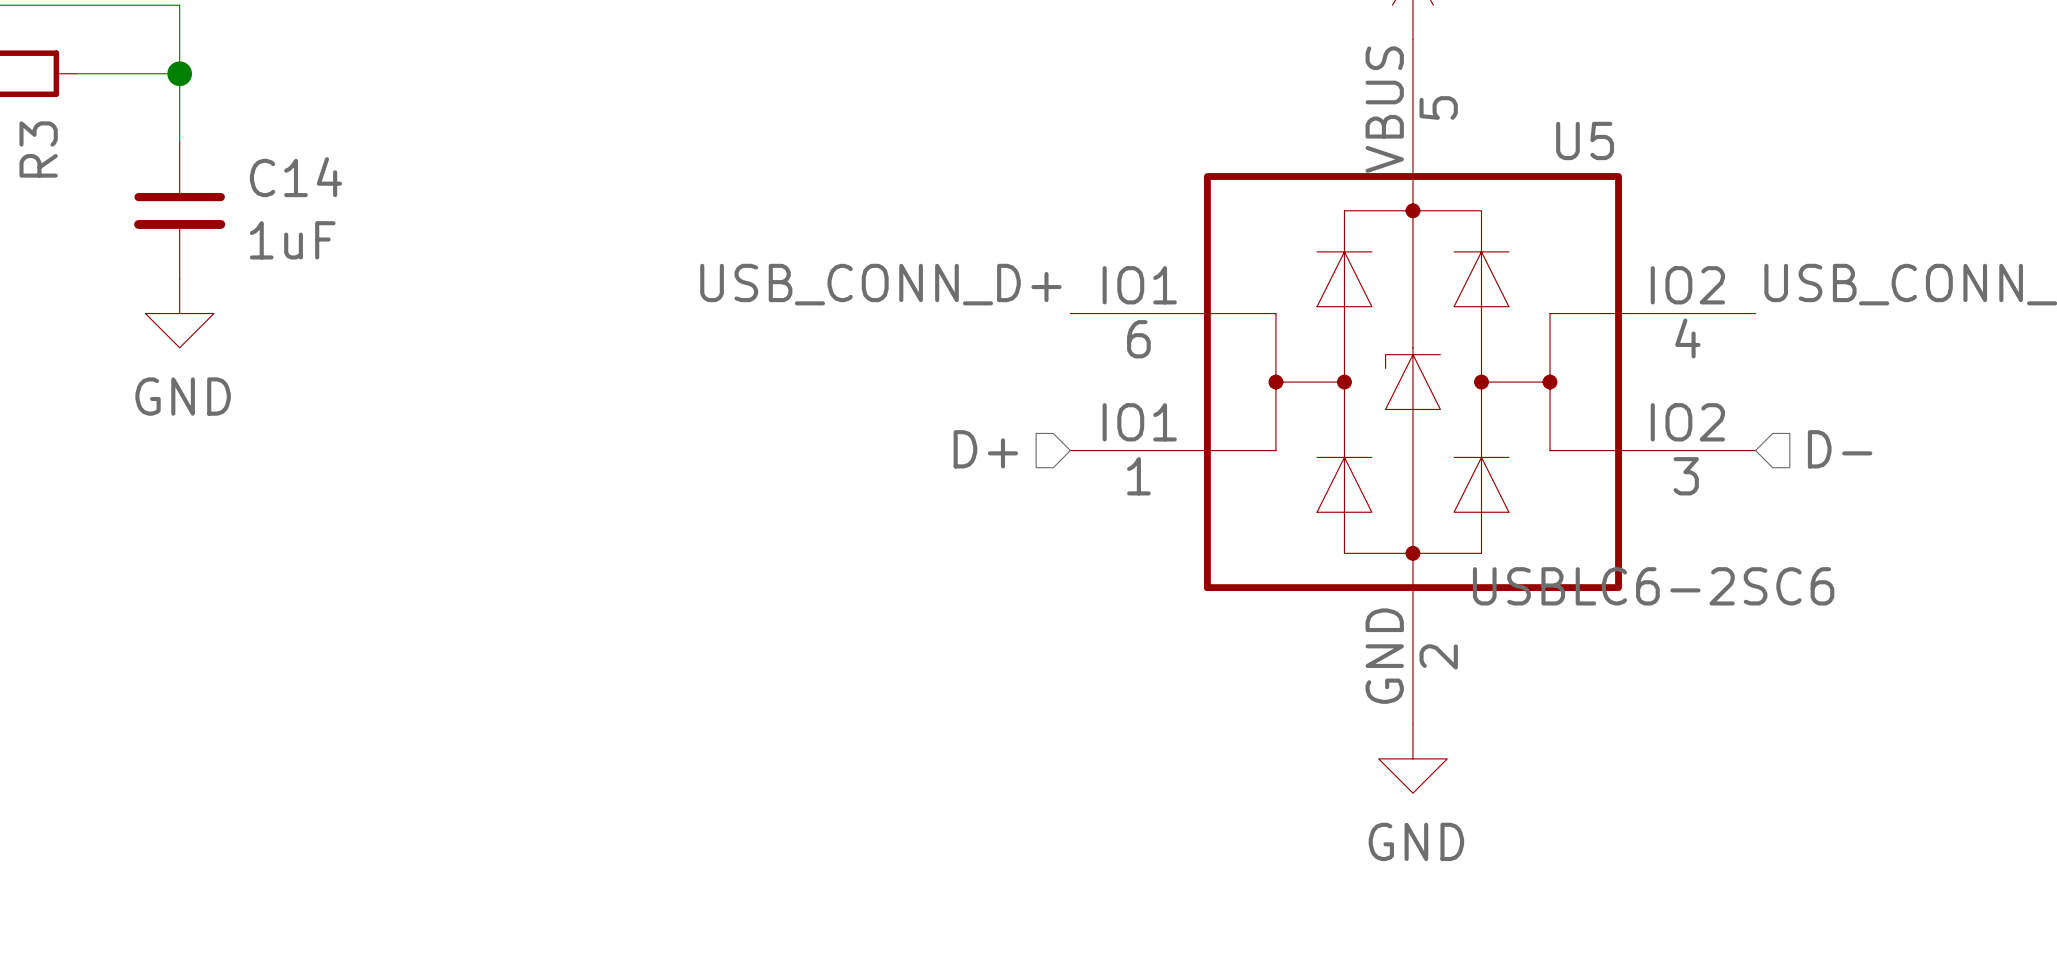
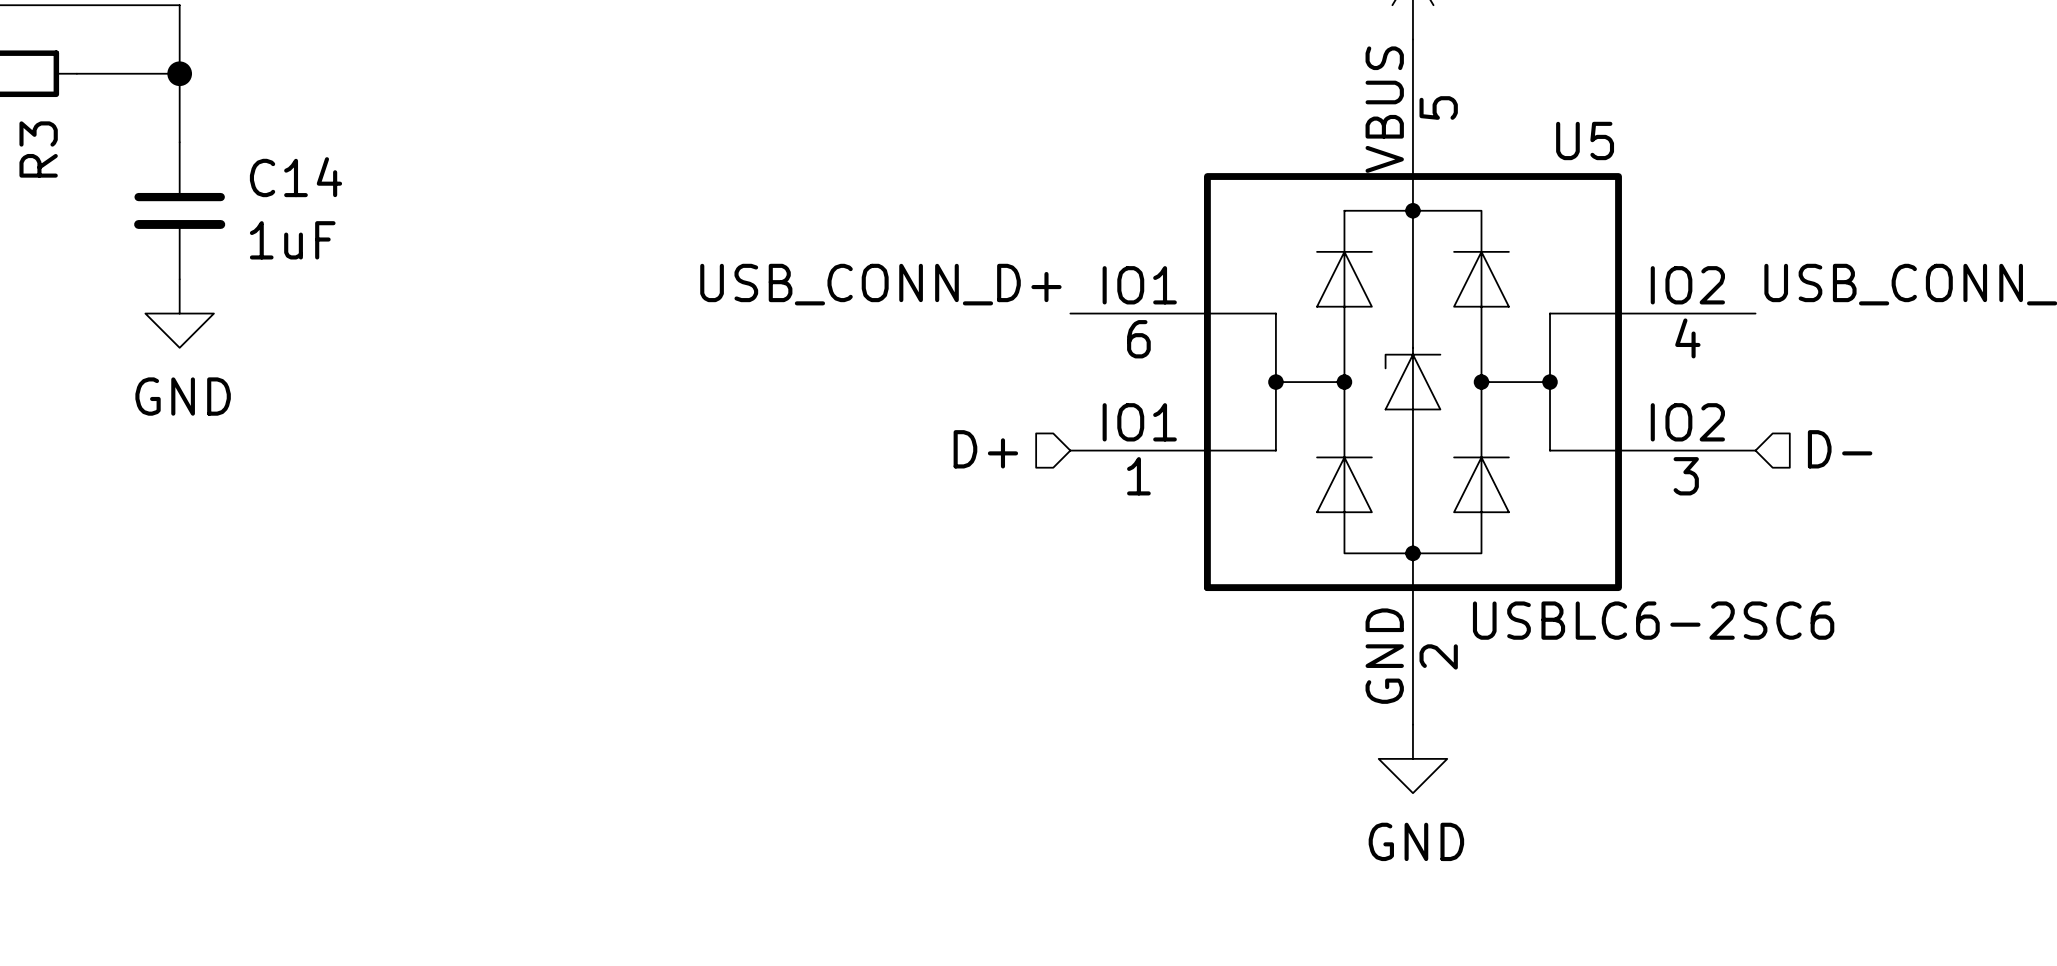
U5 value position: USBLC6-2SC6 (1653, 586) -> USBLC6-2SC6 (1653, 620)

